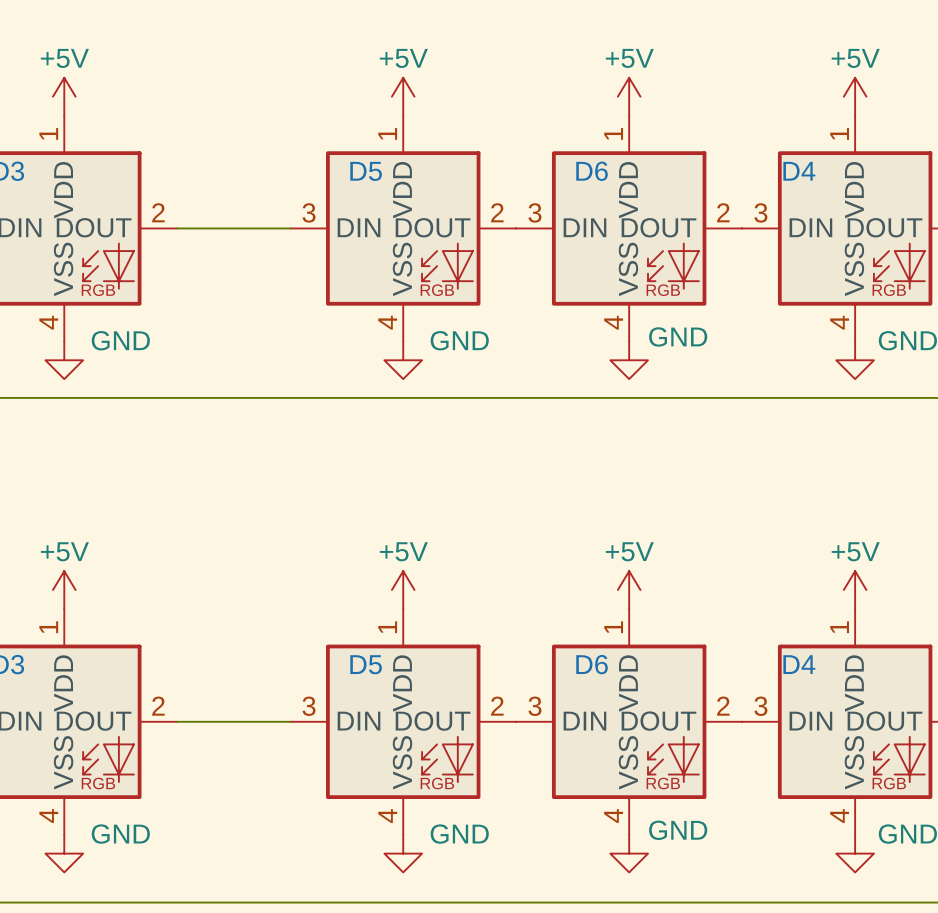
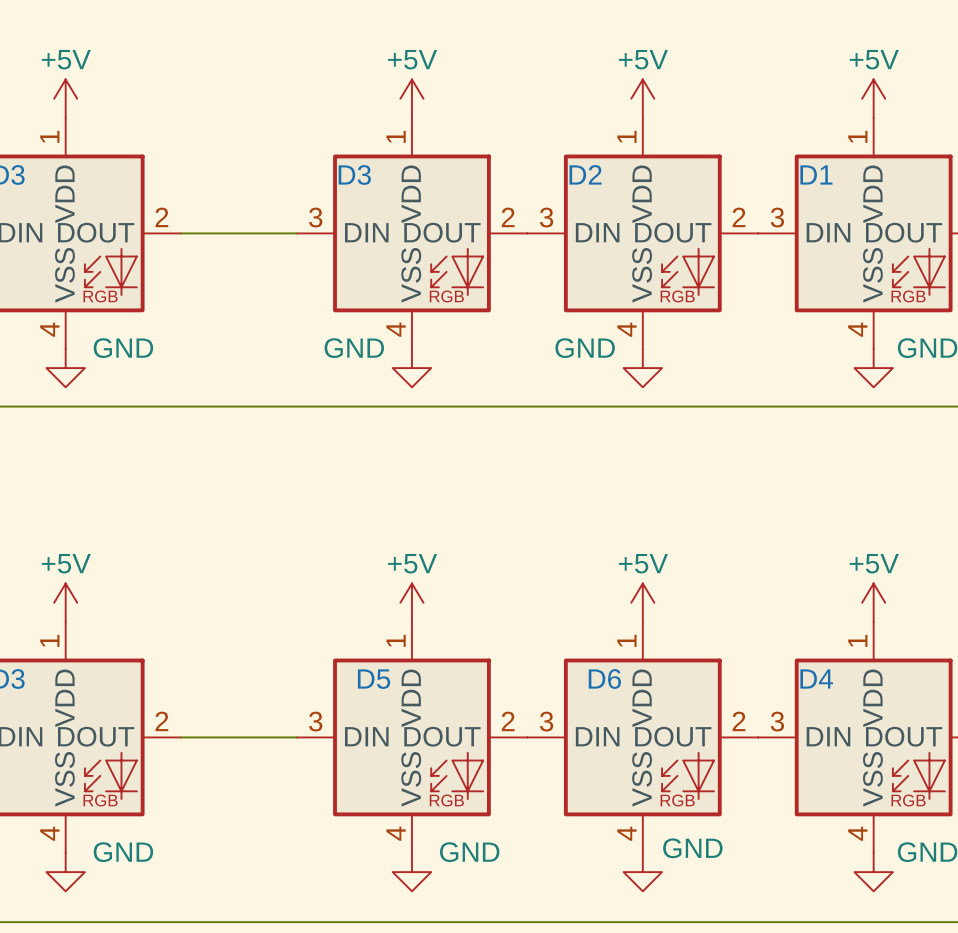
D5 name: D5 (366, 171) -> D3 (354, 174)
D6 name: D6 (592, 171) -> D2 (585, 174)
D4 name: D4 (799, 171) -> D1 (816, 174)
power symbol text position: GND (678, 336) -> GND (585, 348)
power symbol text position: GND (459, 340) -> GND (354, 348)

